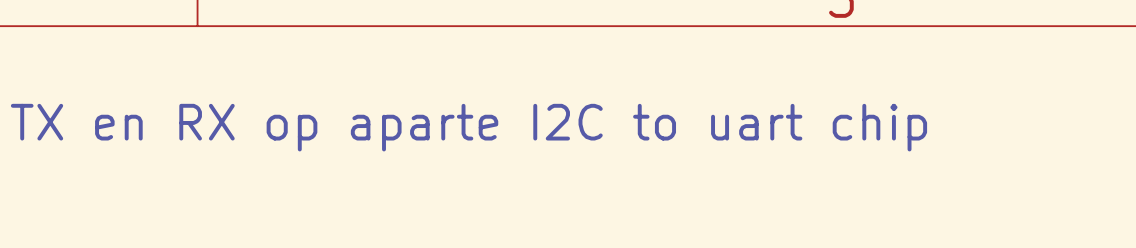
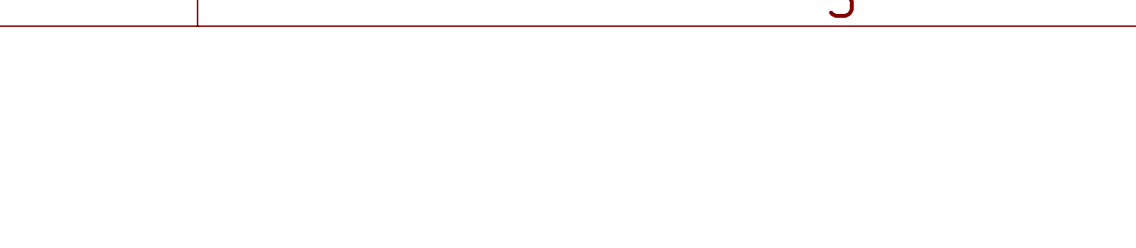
text: TX en RX op aparte I2C to uart chip (468, 127) -> none

